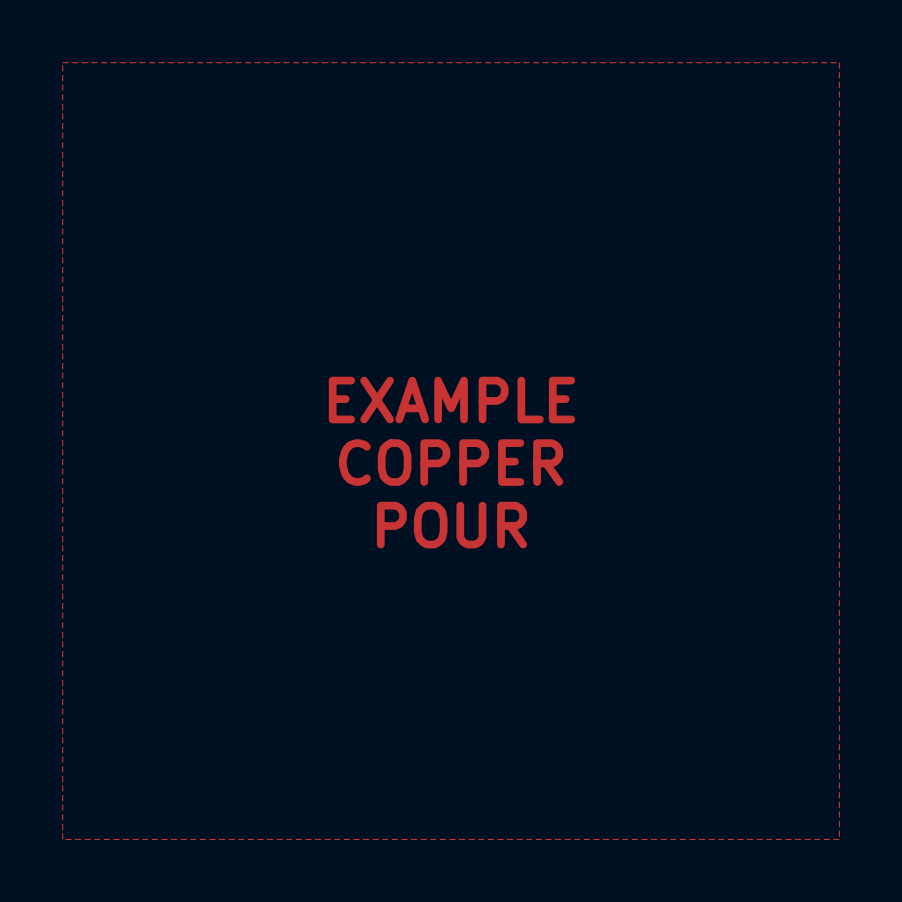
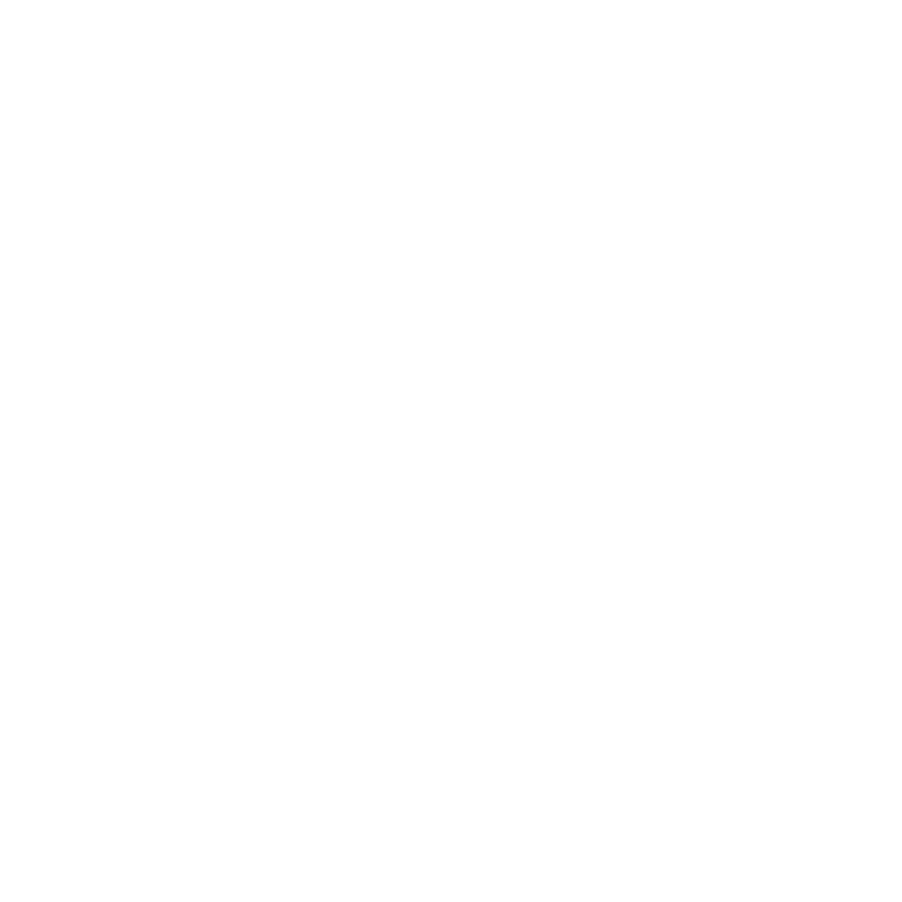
top zone outline: (62, 62) (62, 839) (839, 839) (839, 62) (62, 62) -> none
text: EXAMPLE (451, 400) -> none
text: COPPER (451, 462) -> none
text: POUR (451, 525) -> none

